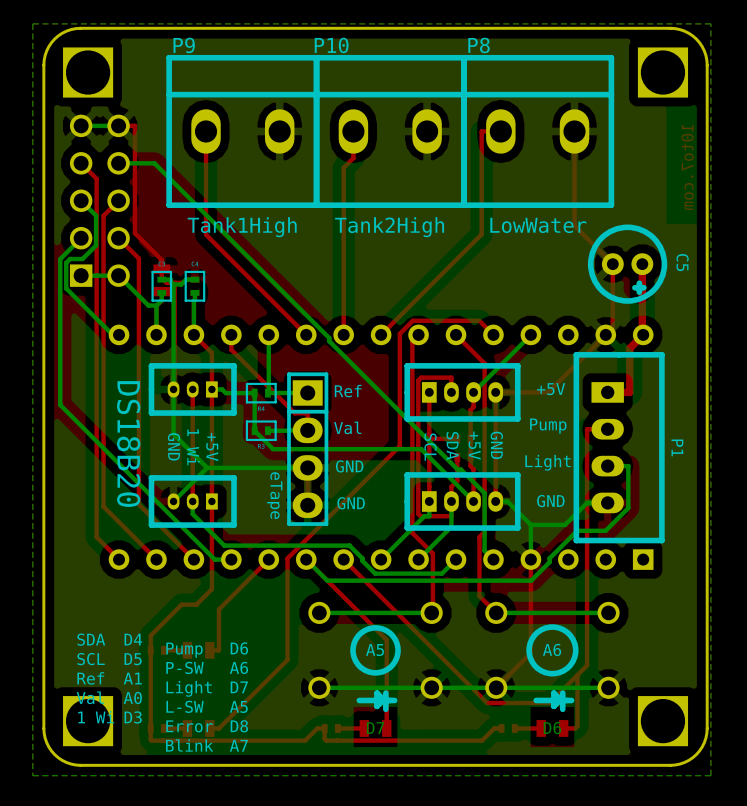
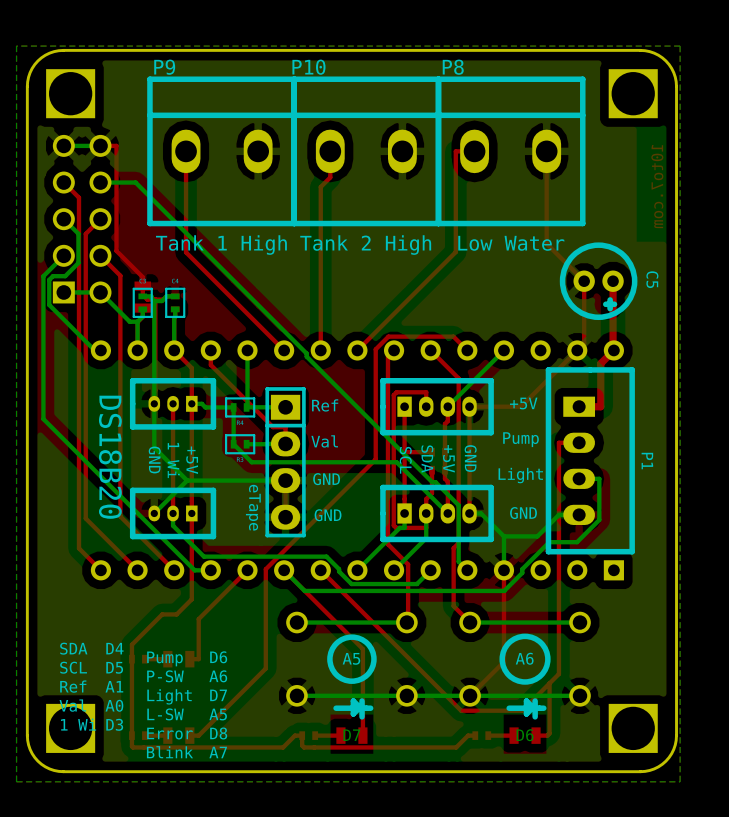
P8 value: LowWater (538, 225) -> Low Water (511, 243)
P9 value: Tank1High (242, 227) -> Tank 1 High (221, 245)
P10 value: Tank2High (389, 227) -> Tank 2 High (365, 245)

